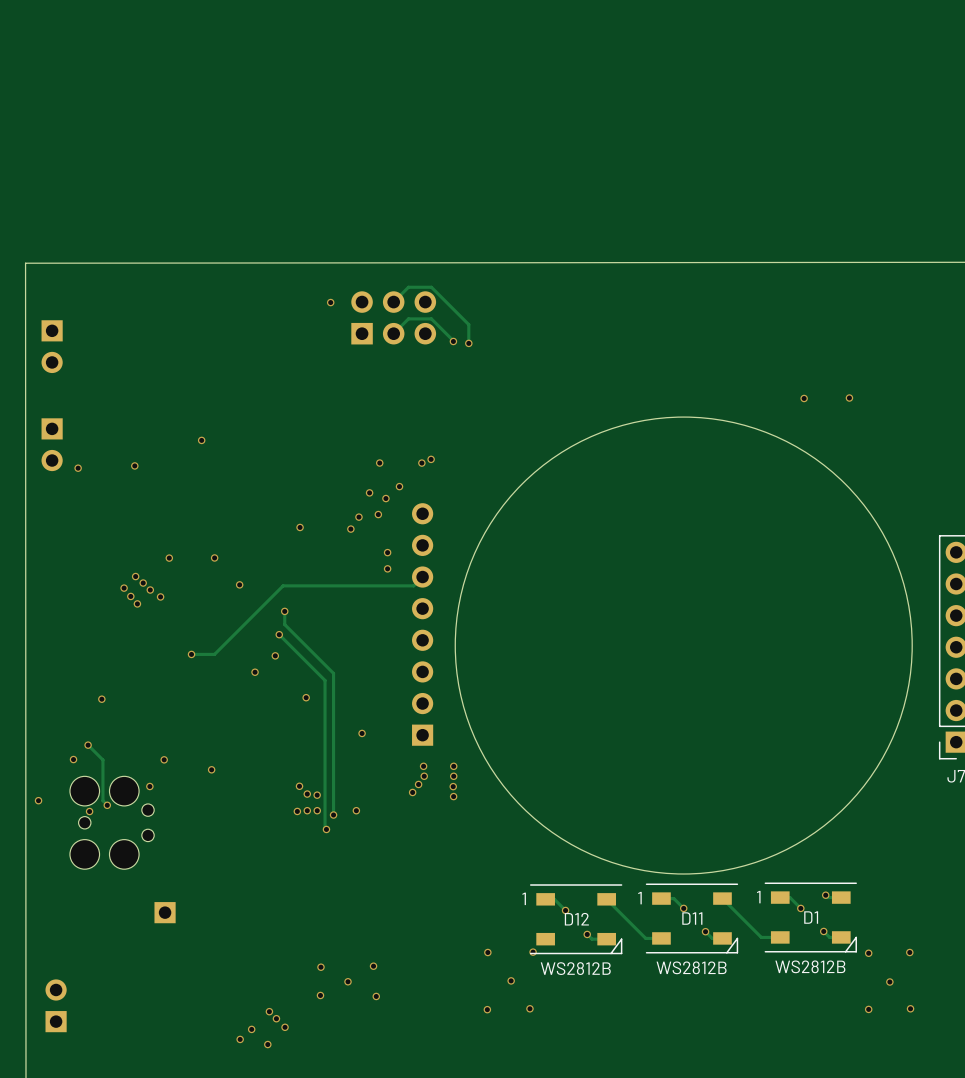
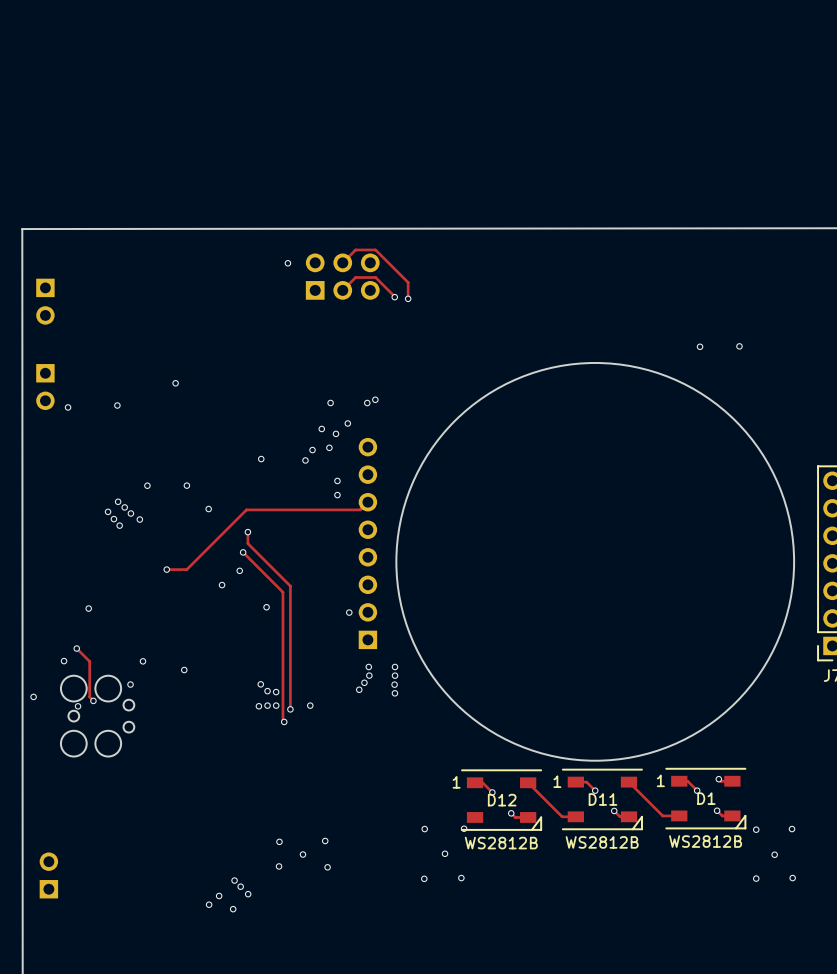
via position: (362, 733) -> (349, 612)
part: (165, 912) -> none

